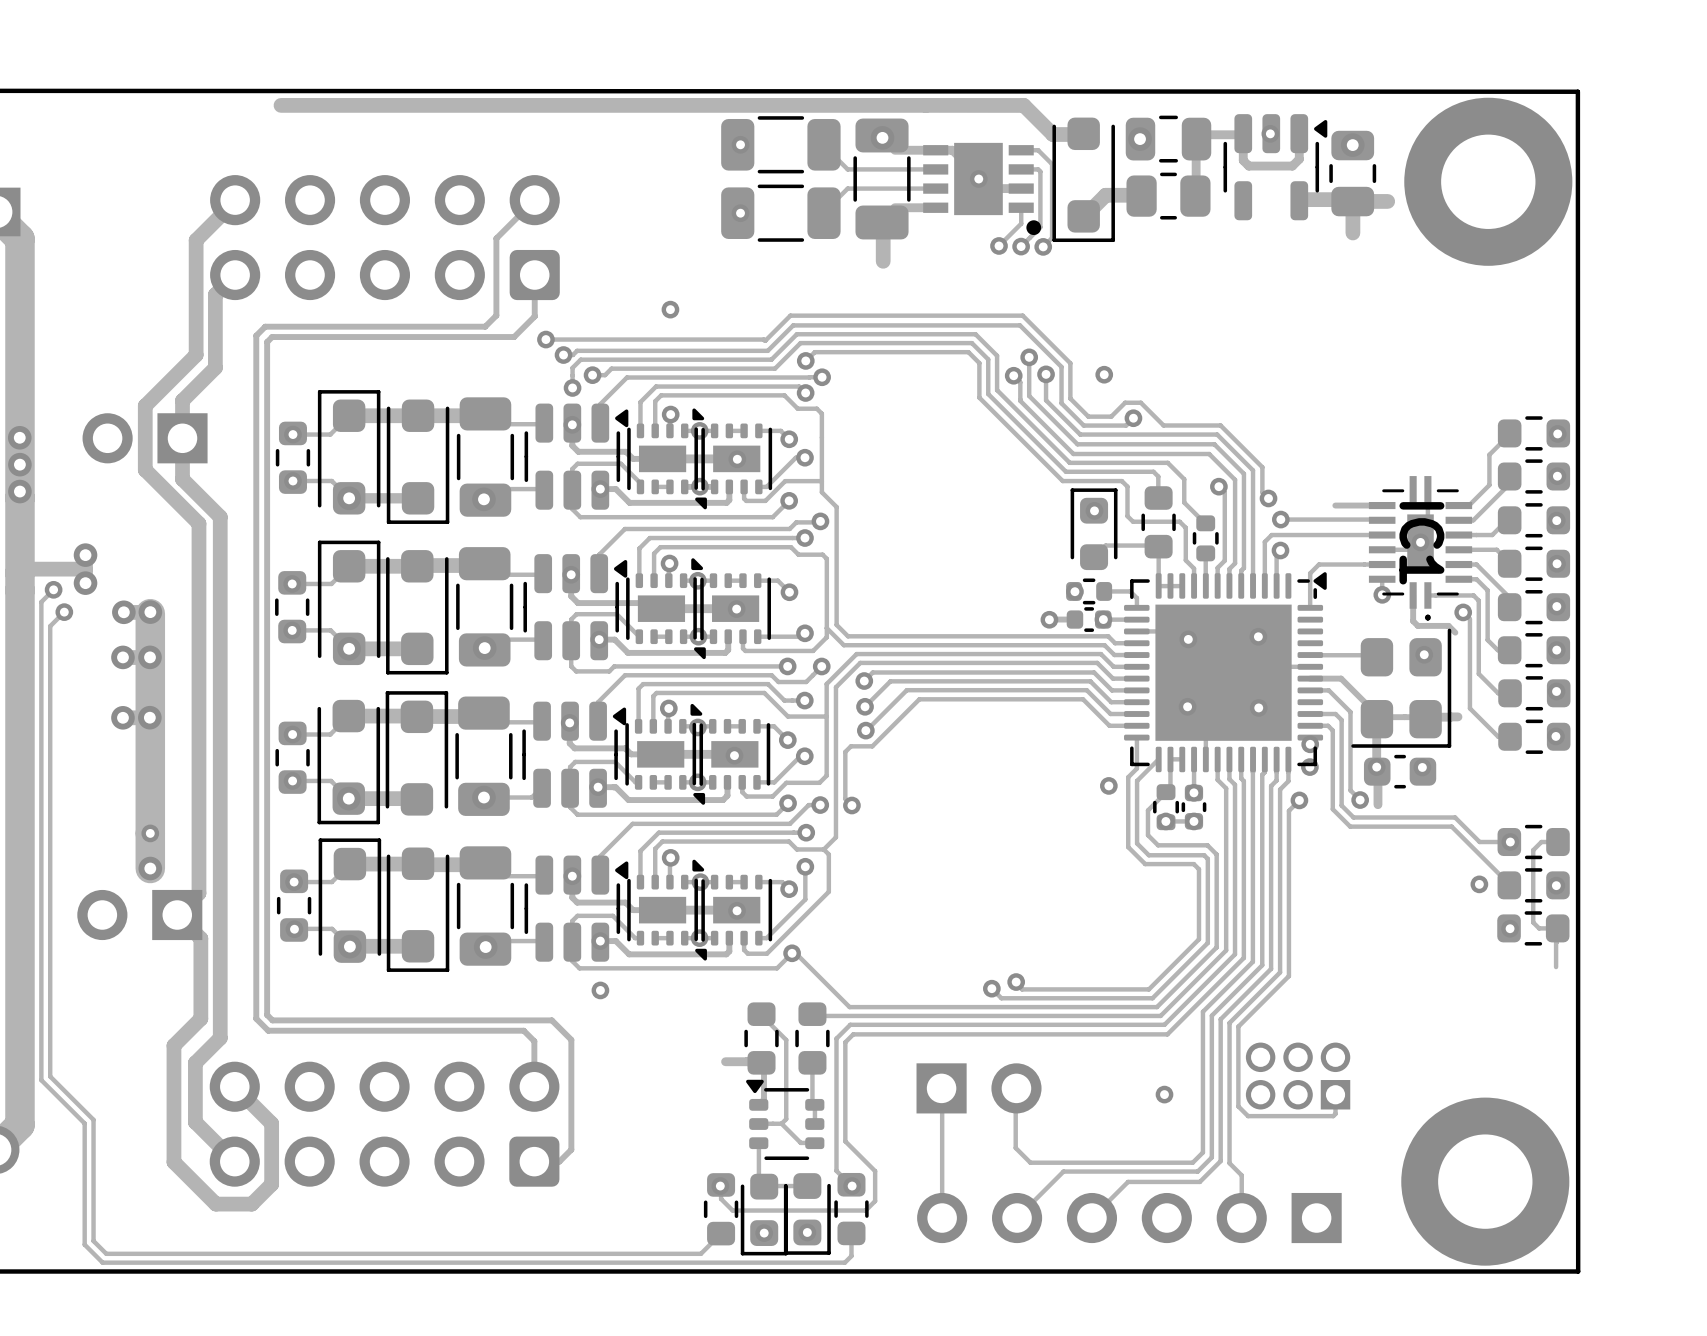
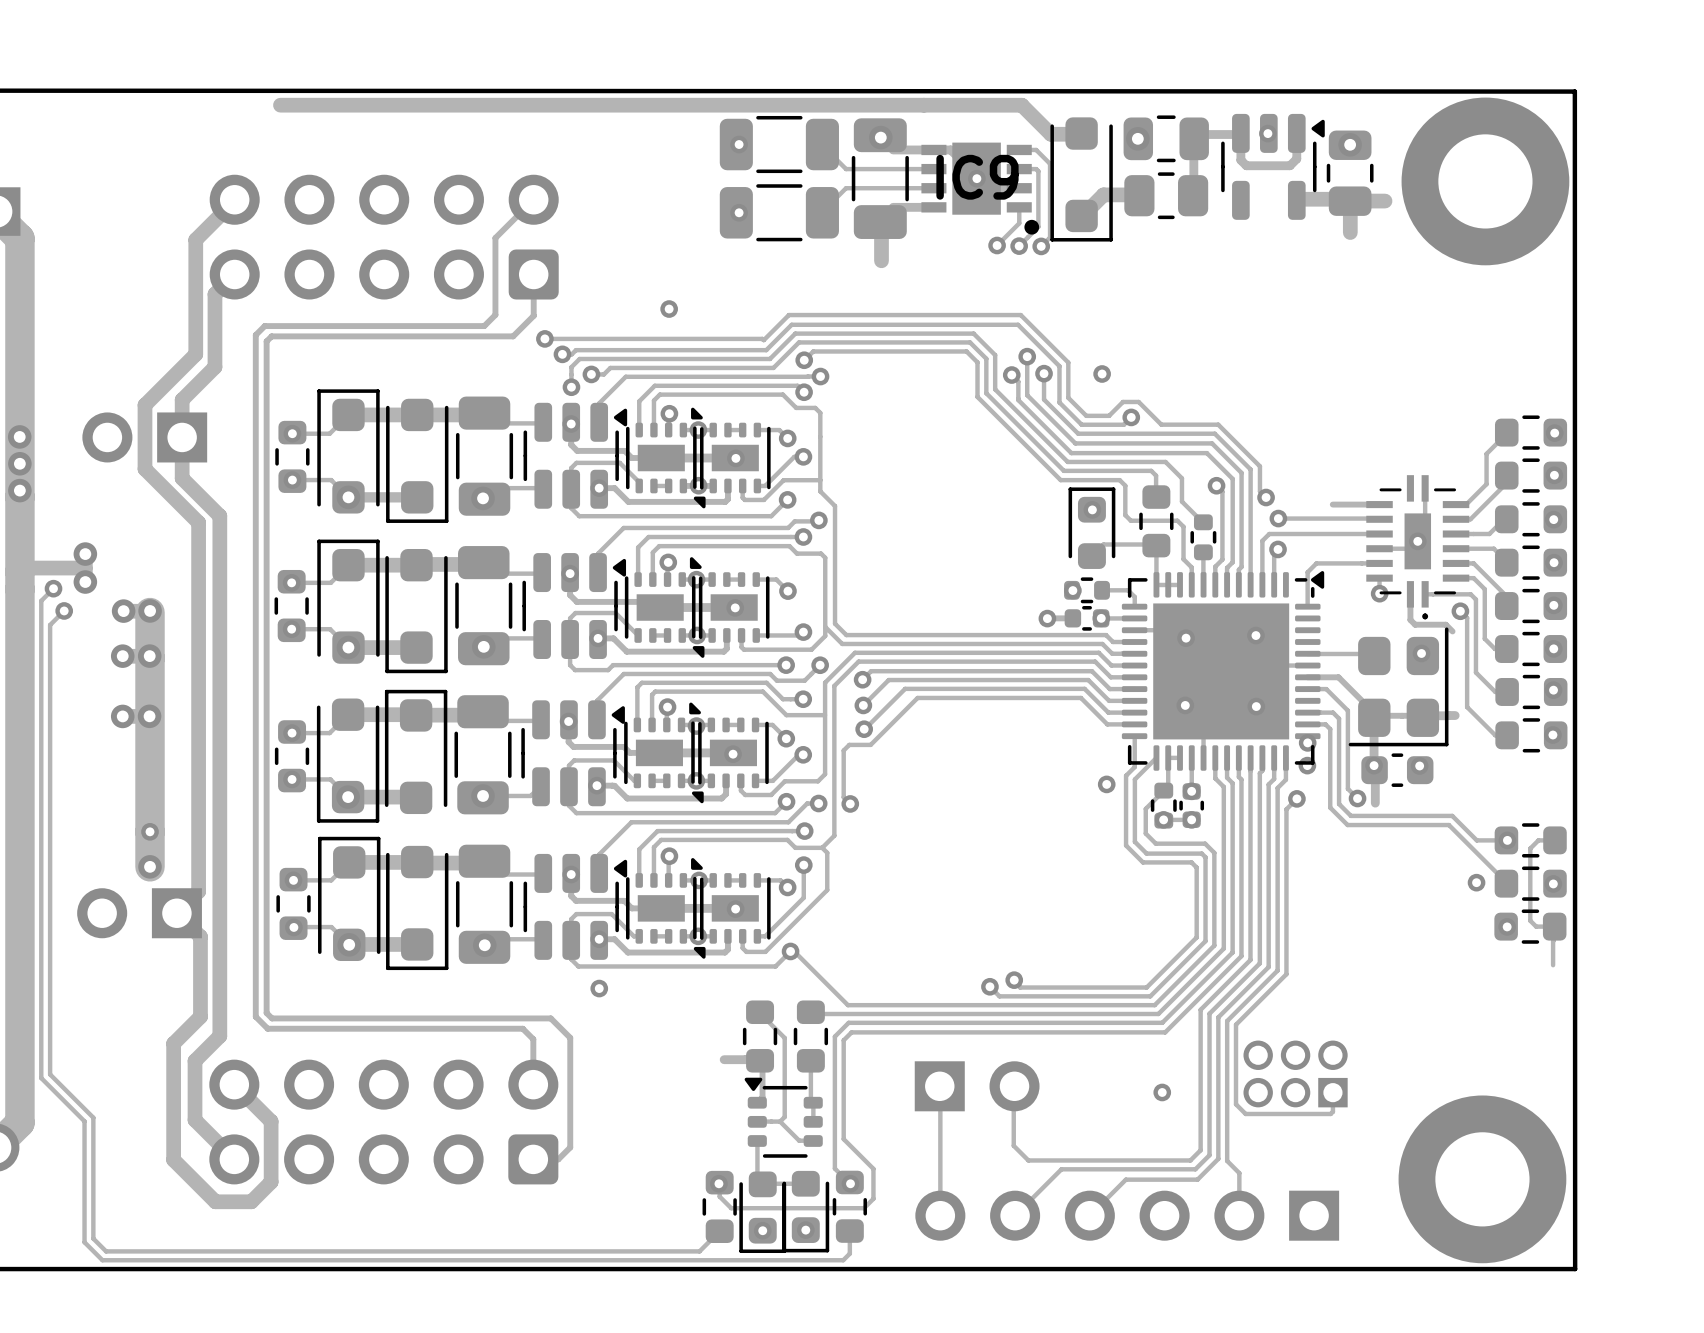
IC9 name: none -> IC9 (977, 177)
IC1 name: IC1 (1421, 543) -> none

